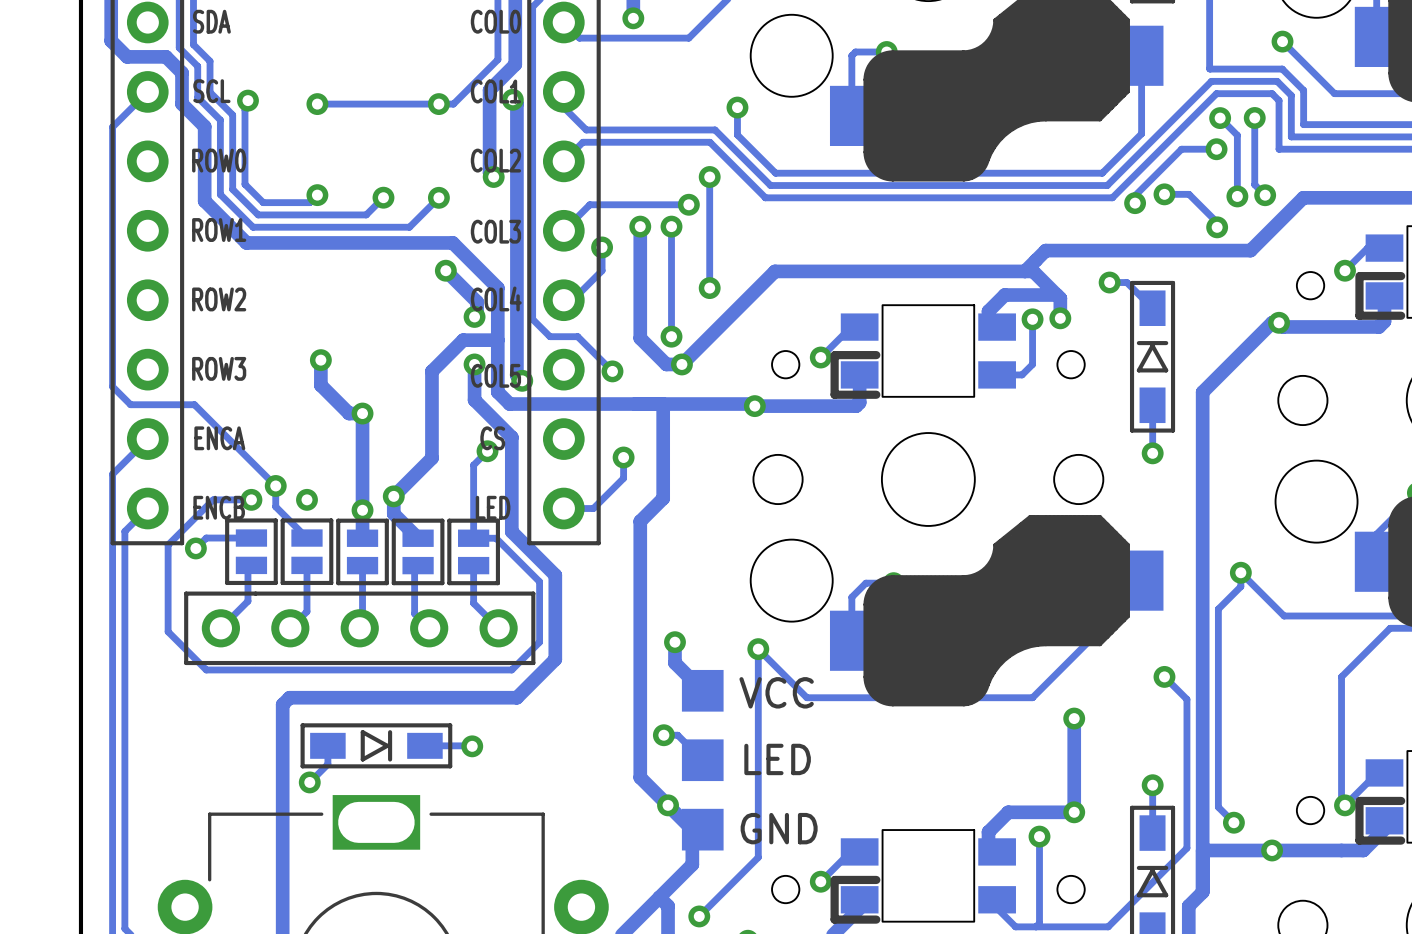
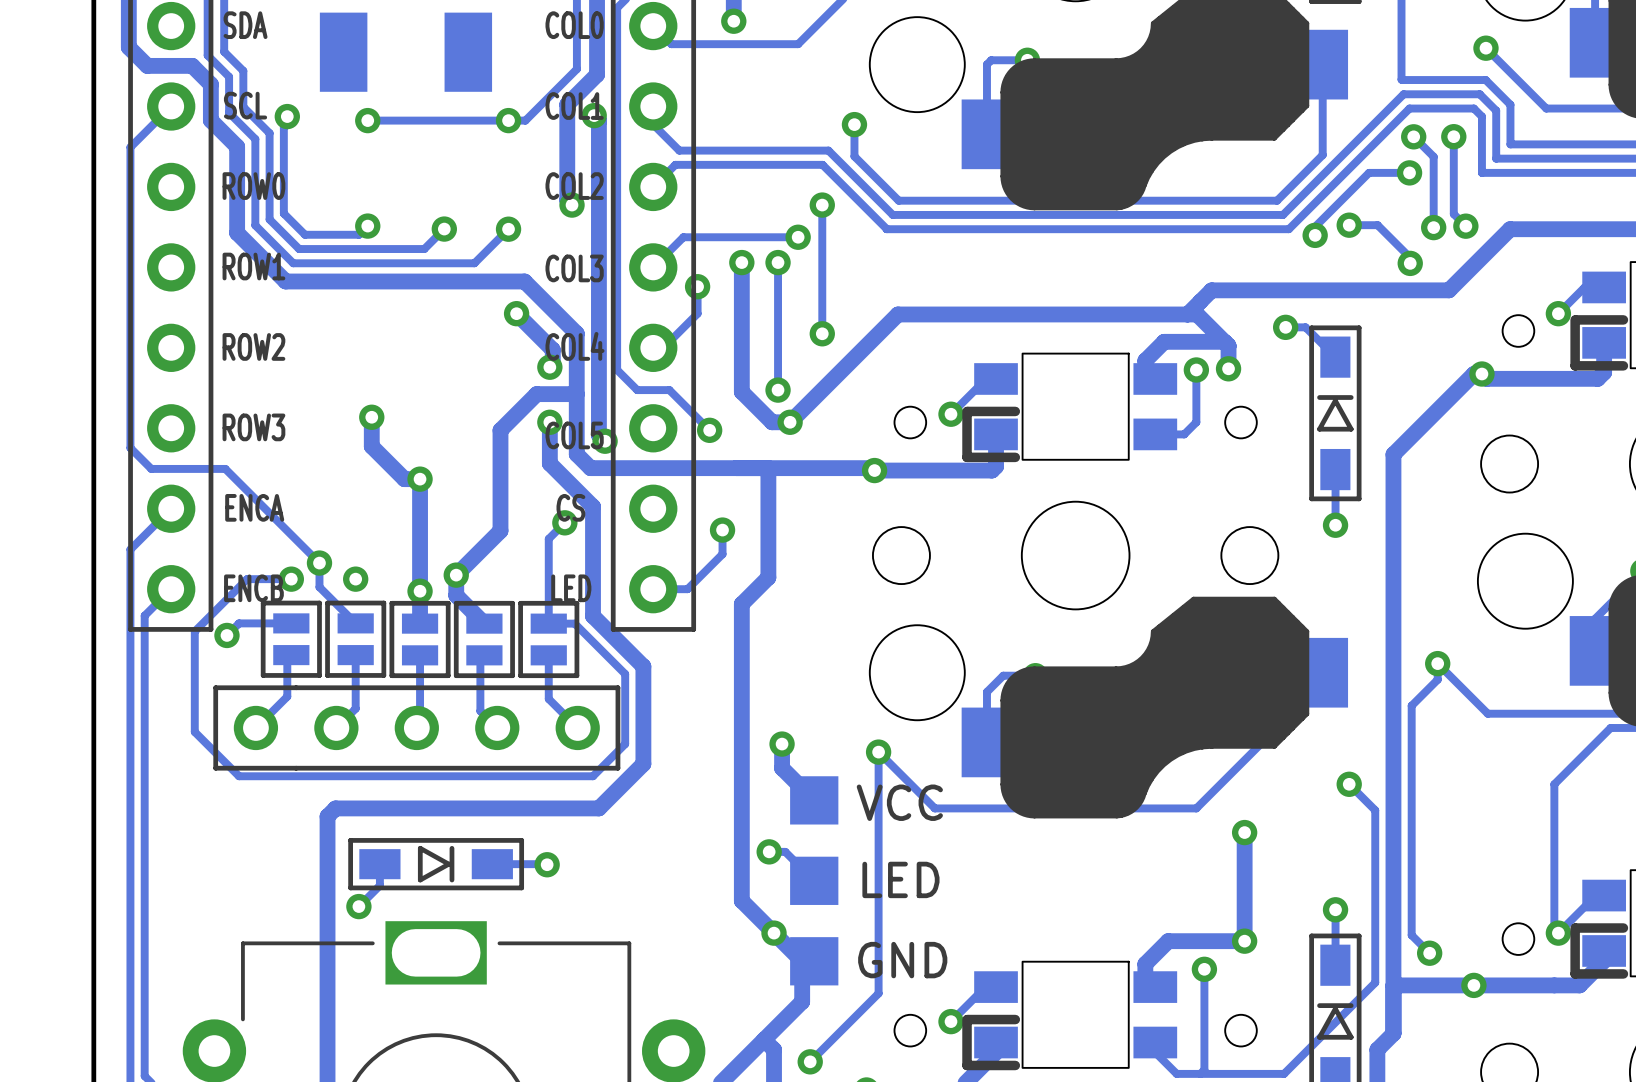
part: none -> (343, 52)
part: none -> (468, 52)

